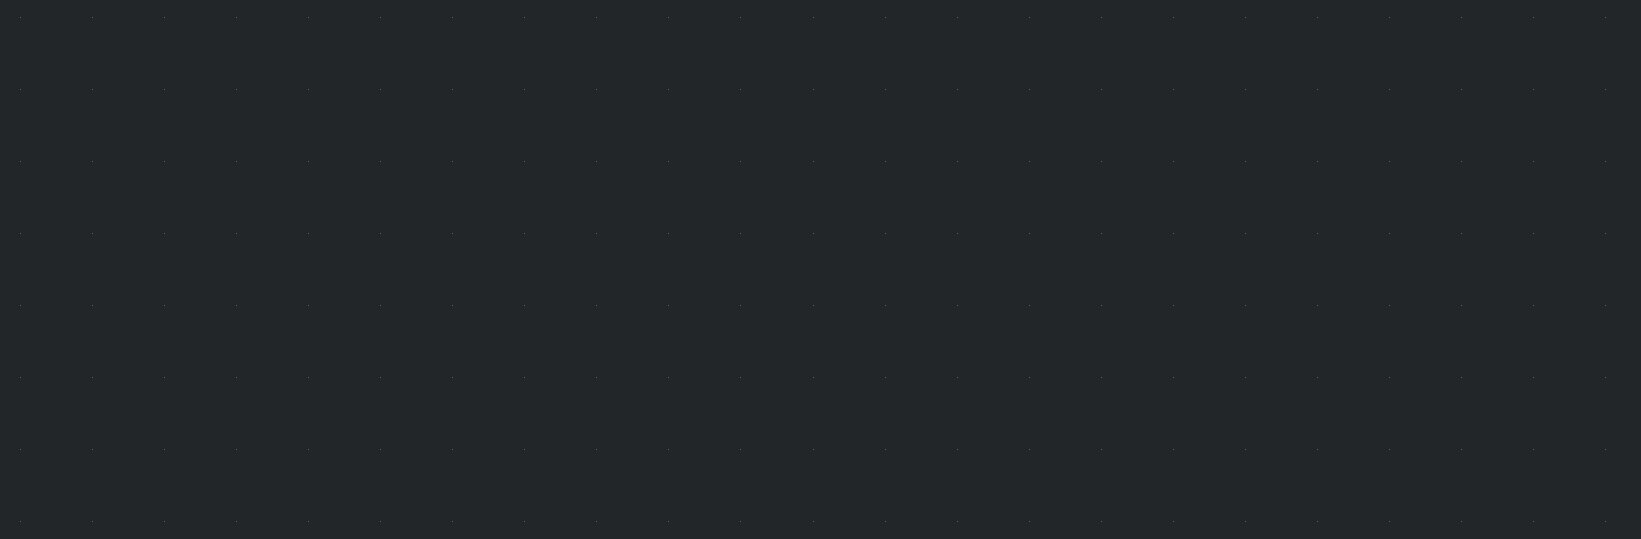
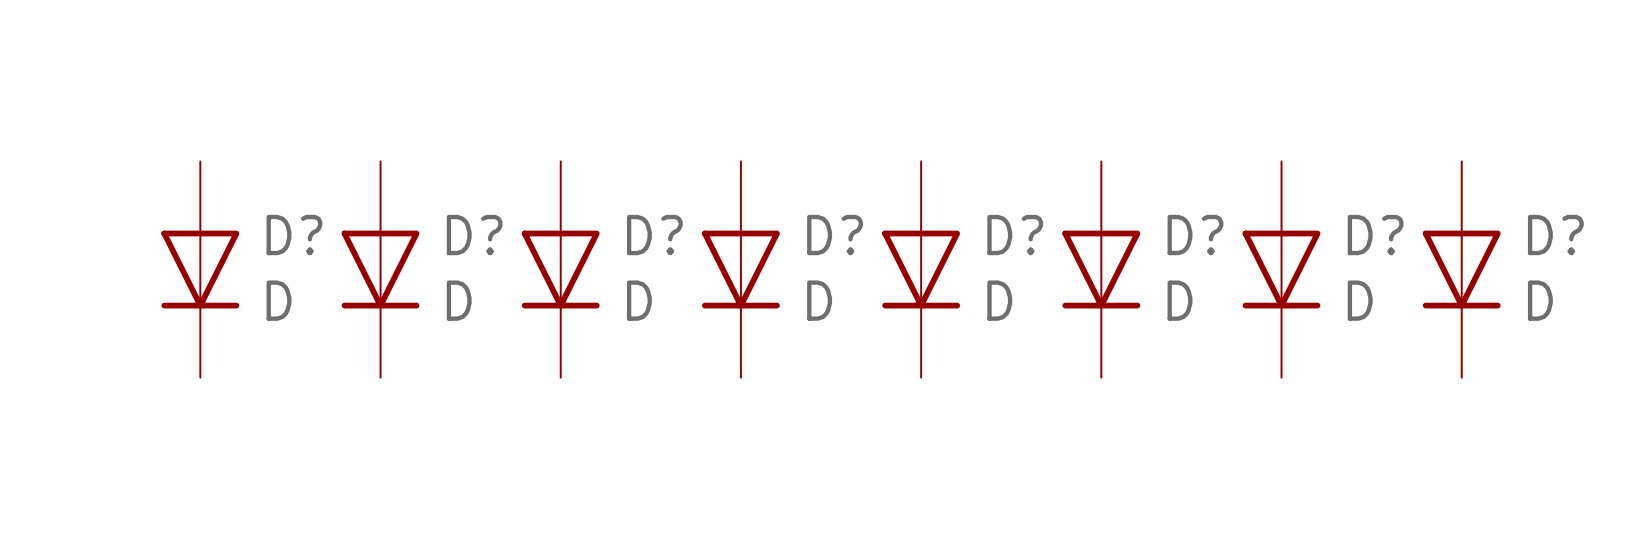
D?: none -> D (200, 269)
D?: none -> D (380, 269)
D?: none -> D (560, 269)
D?: none -> D (740, 269)
D?: none -> D (921, 269)
D?: none -> D (1101, 269)
D?: none -> D (1281, 269)
D?: none -> D (1461, 269)

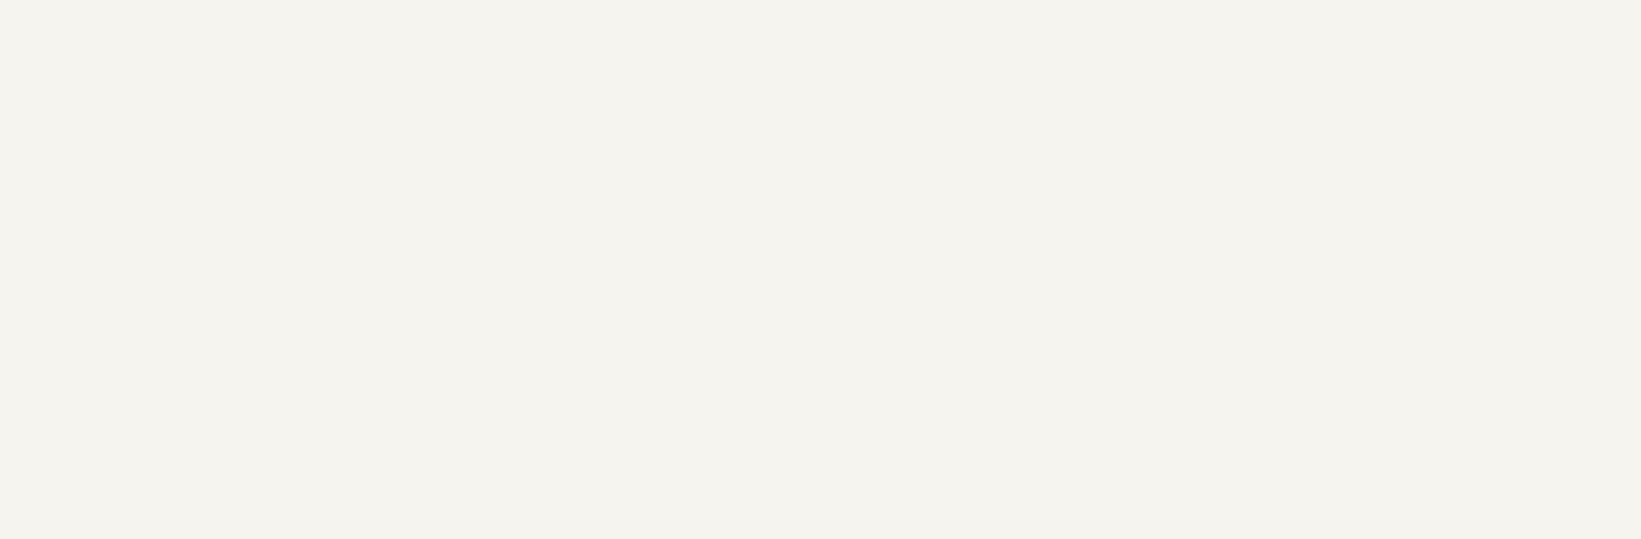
D?: D (200, 269) -> none
D?: D (380, 269) -> none
D?: D (560, 269) -> none
D?: D (740, 269) -> none
D?: D (921, 269) -> none
D?: D (1101, 269) -> none
D?: D (1281, 269) -> none
D?: D (1461, 269) -> none

